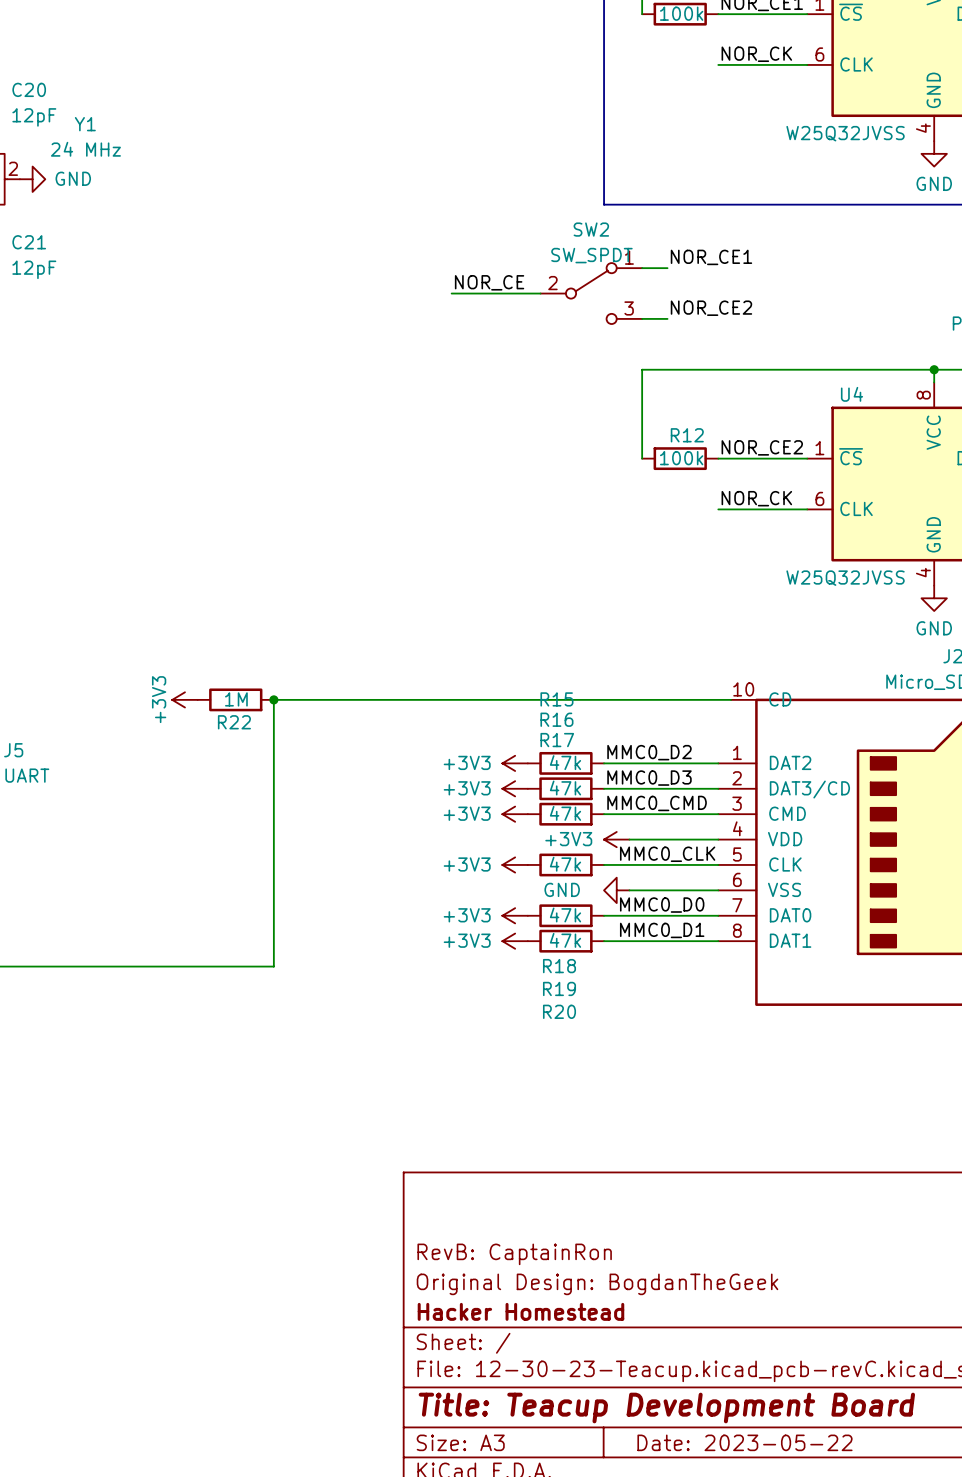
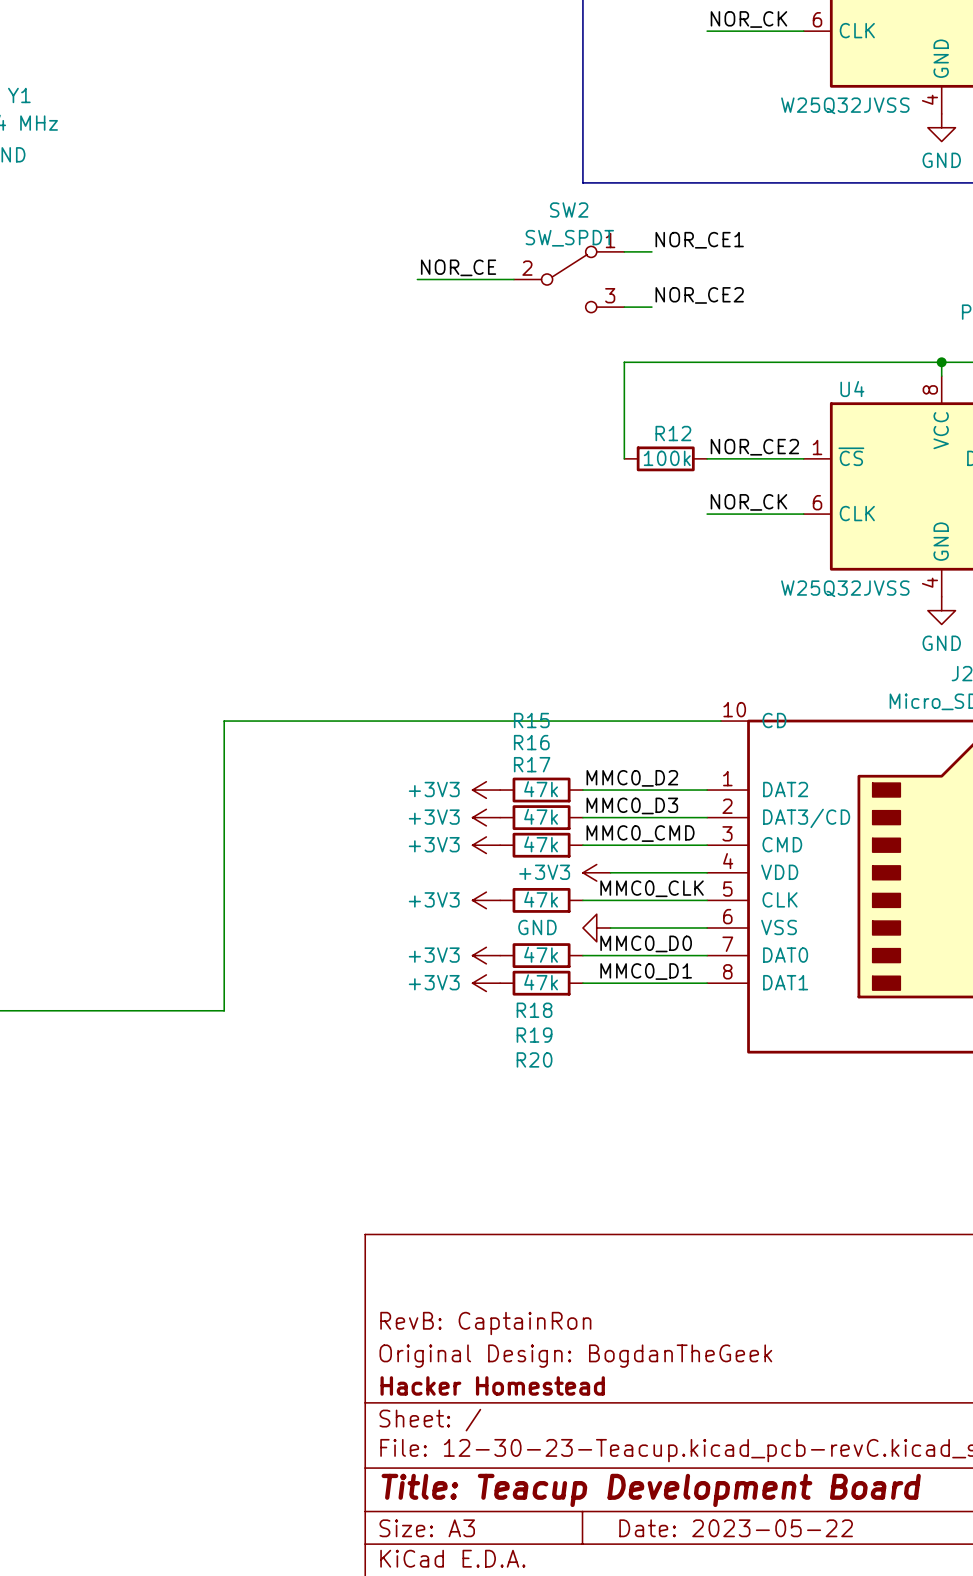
power symbol: +3V3 (184, 699) -> none
R22: 1M (235, 699) -> none
junction: (273, 699) -> none

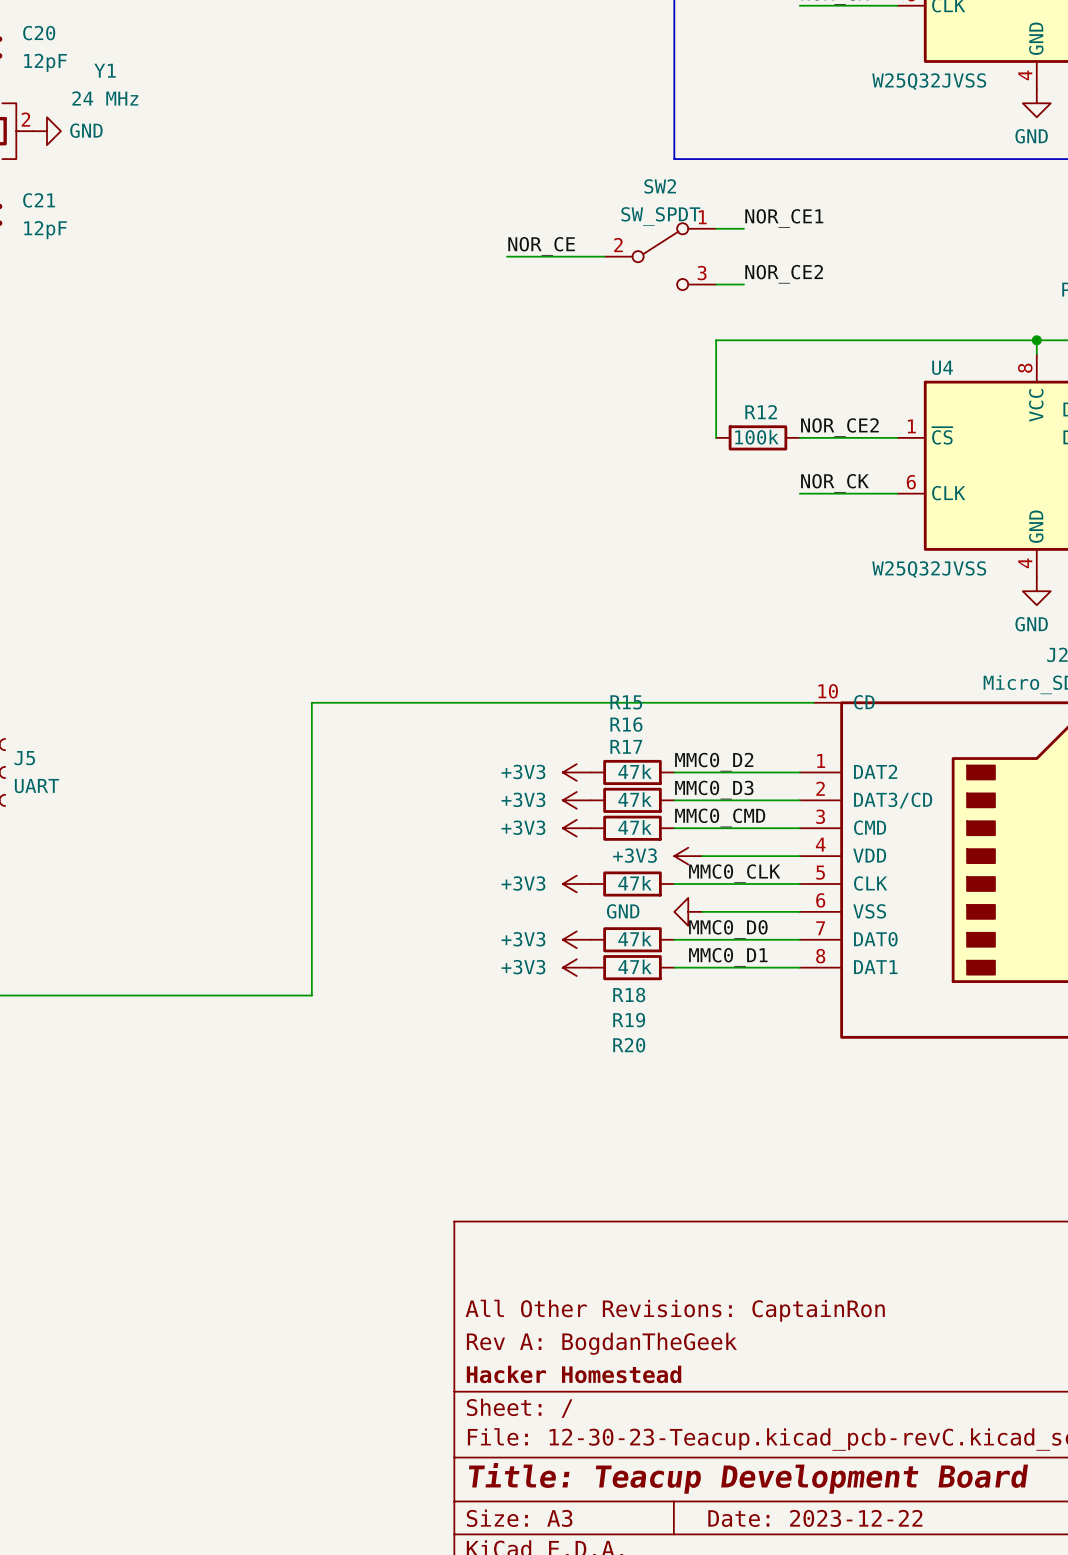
title block: RevB: CaptainRon (485, 1323) -> All Other Revisions: CaptainRon (675, 1310)
title block: Original Design: BogdanTheGeek (575, 1356) -> Rev A: BogdanTheGeek (601, 1343)
title block: Date: 2023-05-22 (736, 1528) -> Date: 2023-12-22 (815, 1518)

